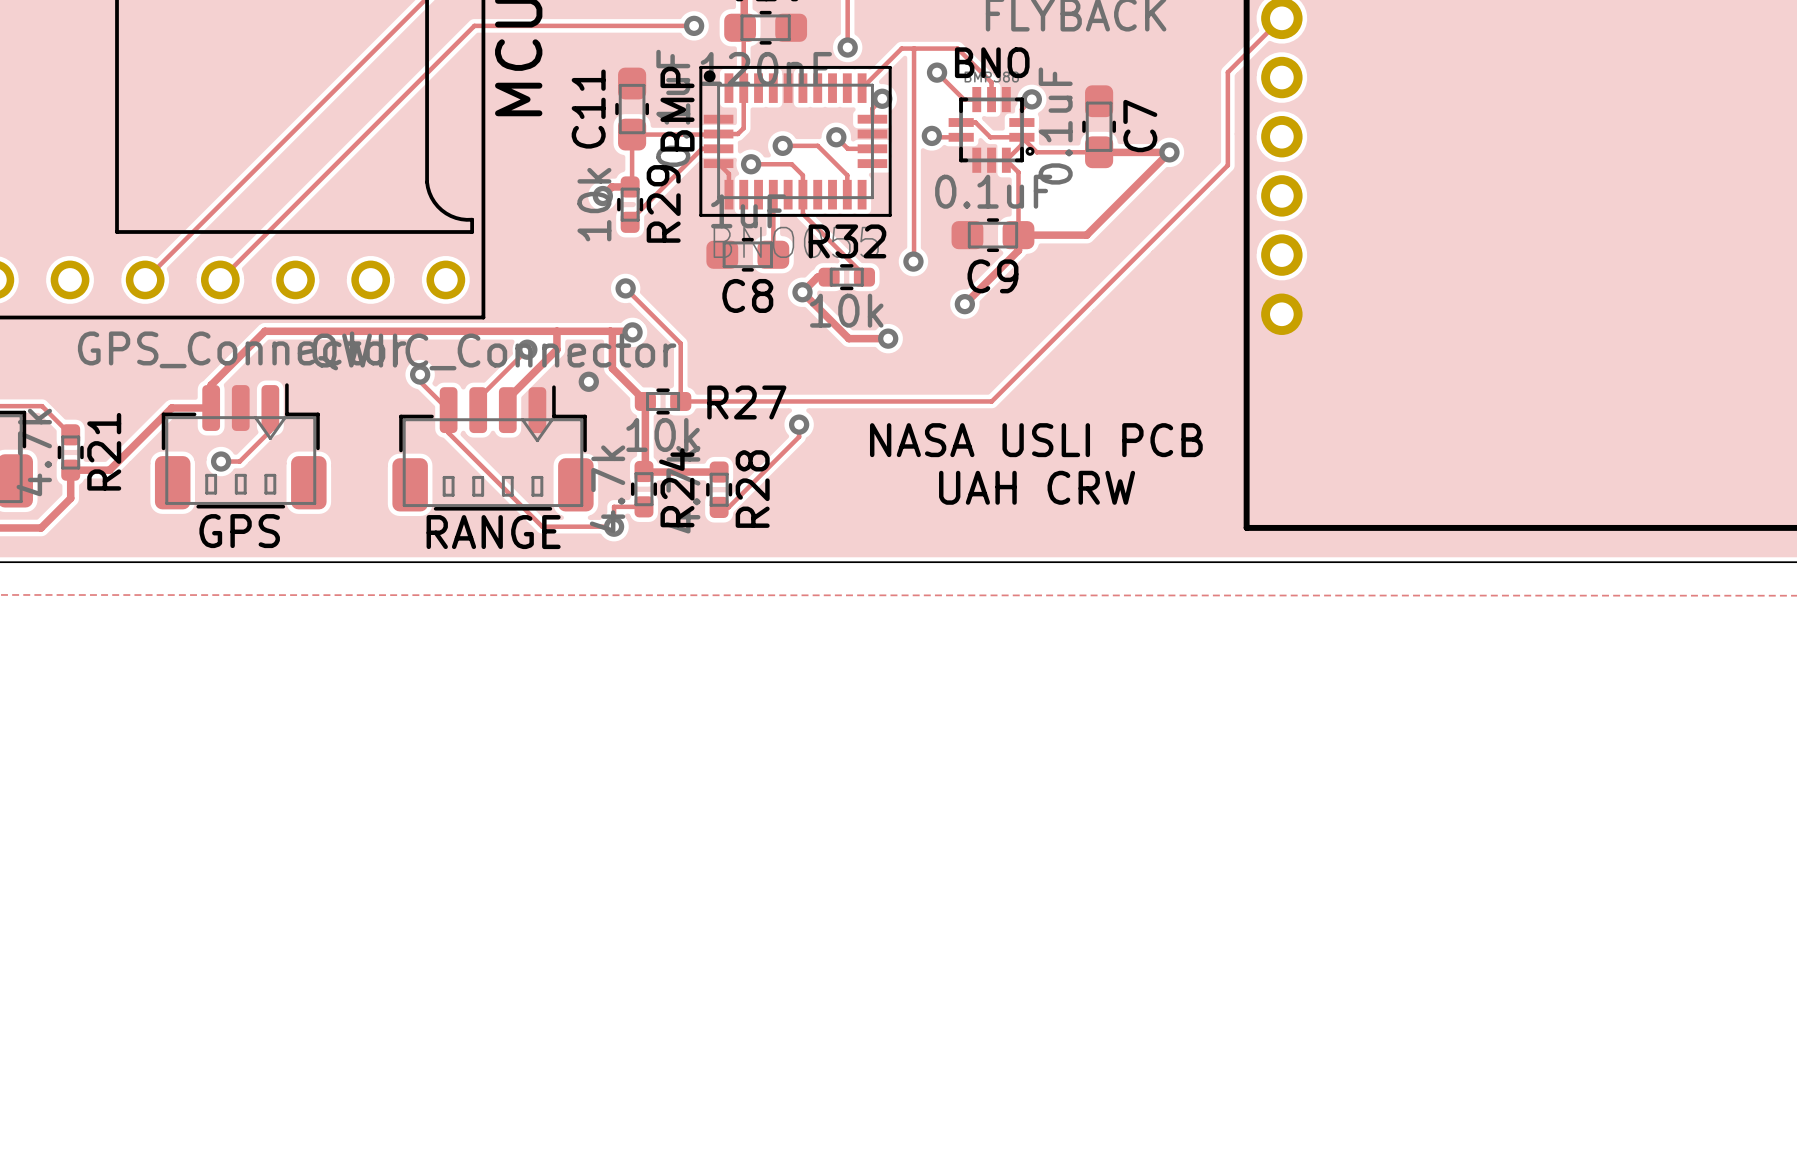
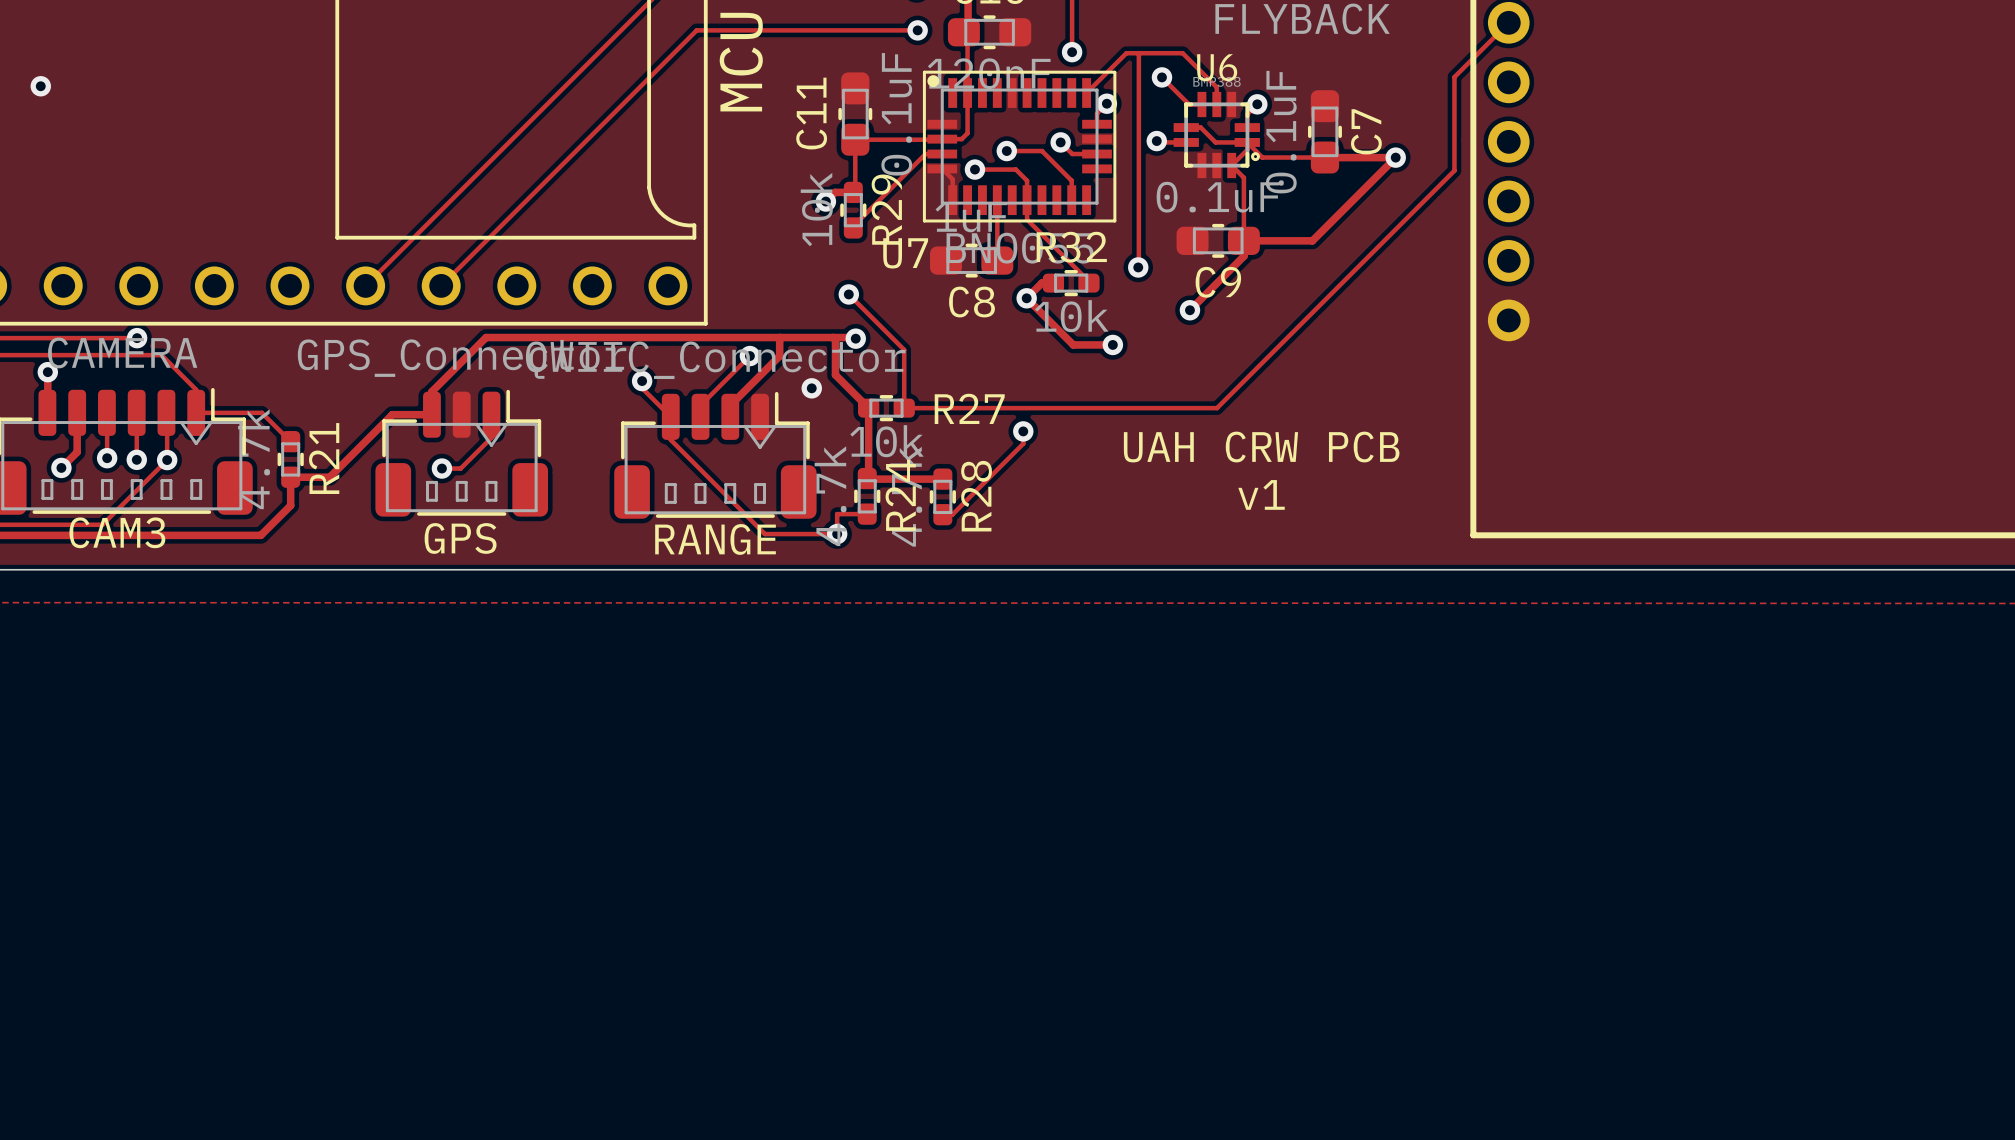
BNO name: BNO (992, 62) -> U6 (1217, 67)
BMP name: BMP (677, 109) -> U7 (905, 253)
text: NASA USLI PCB (1036, 440) -> UAH CRW PCB (1261, 447)
text: UAH CRW (1037, 487) -> v1 (1261, 494)

